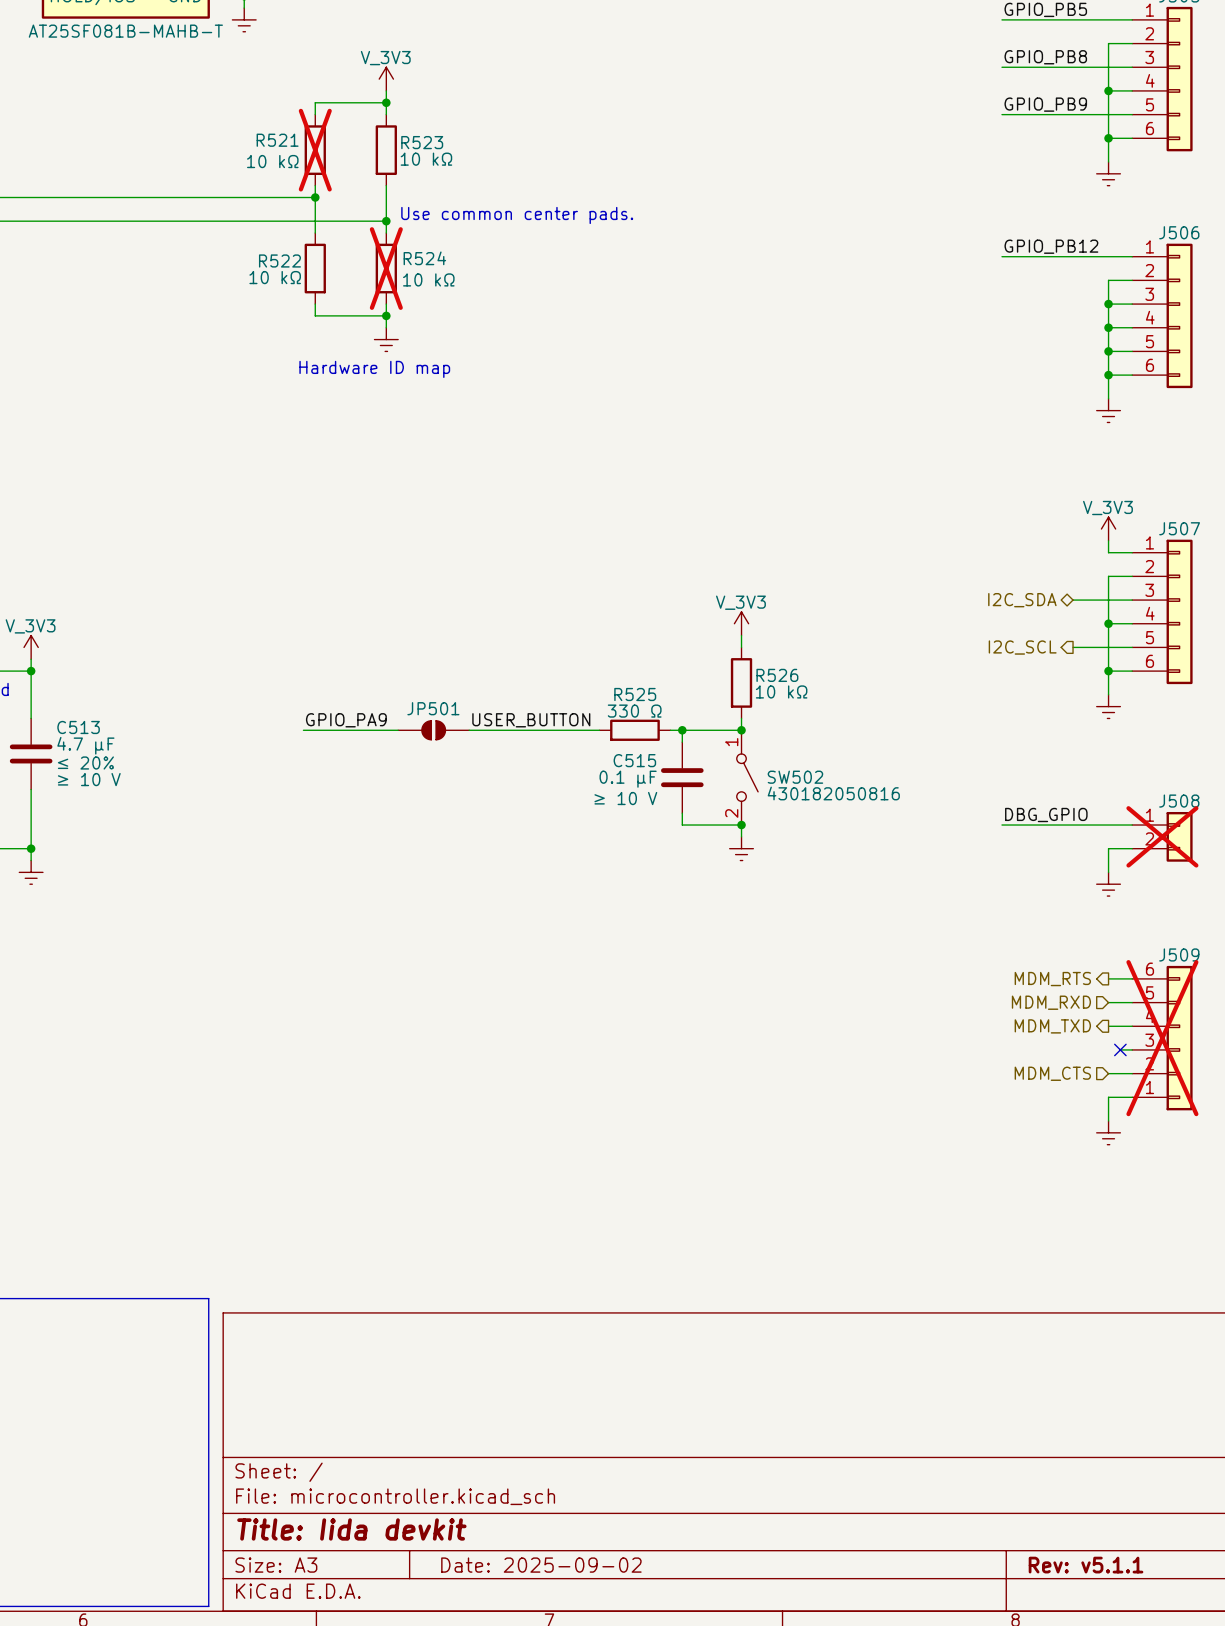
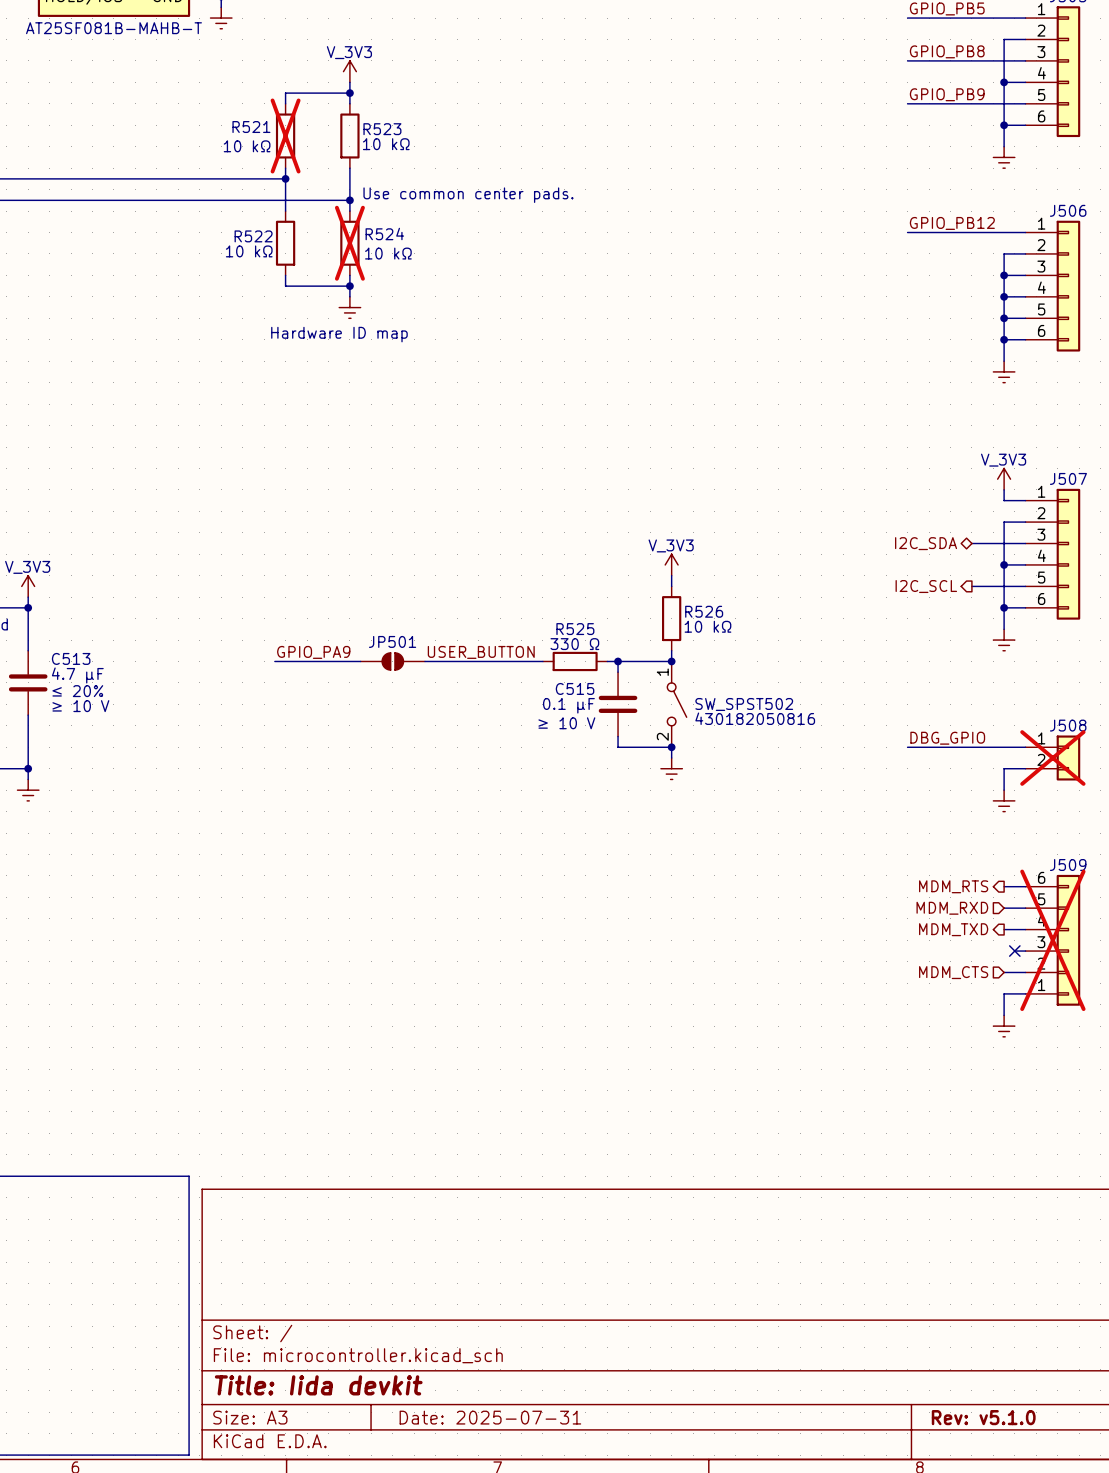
SW502 name: SW502 (795, 777) -> SW_SPST502 (744, 704)
title block: Date: 2025-09-02 (541, 1565) -> Date: 2025-07-31 (490, 1417)
title block: Rev: v5.1.1 (1086, 1565) -> Rev: v5.1.0 (983, 1417)

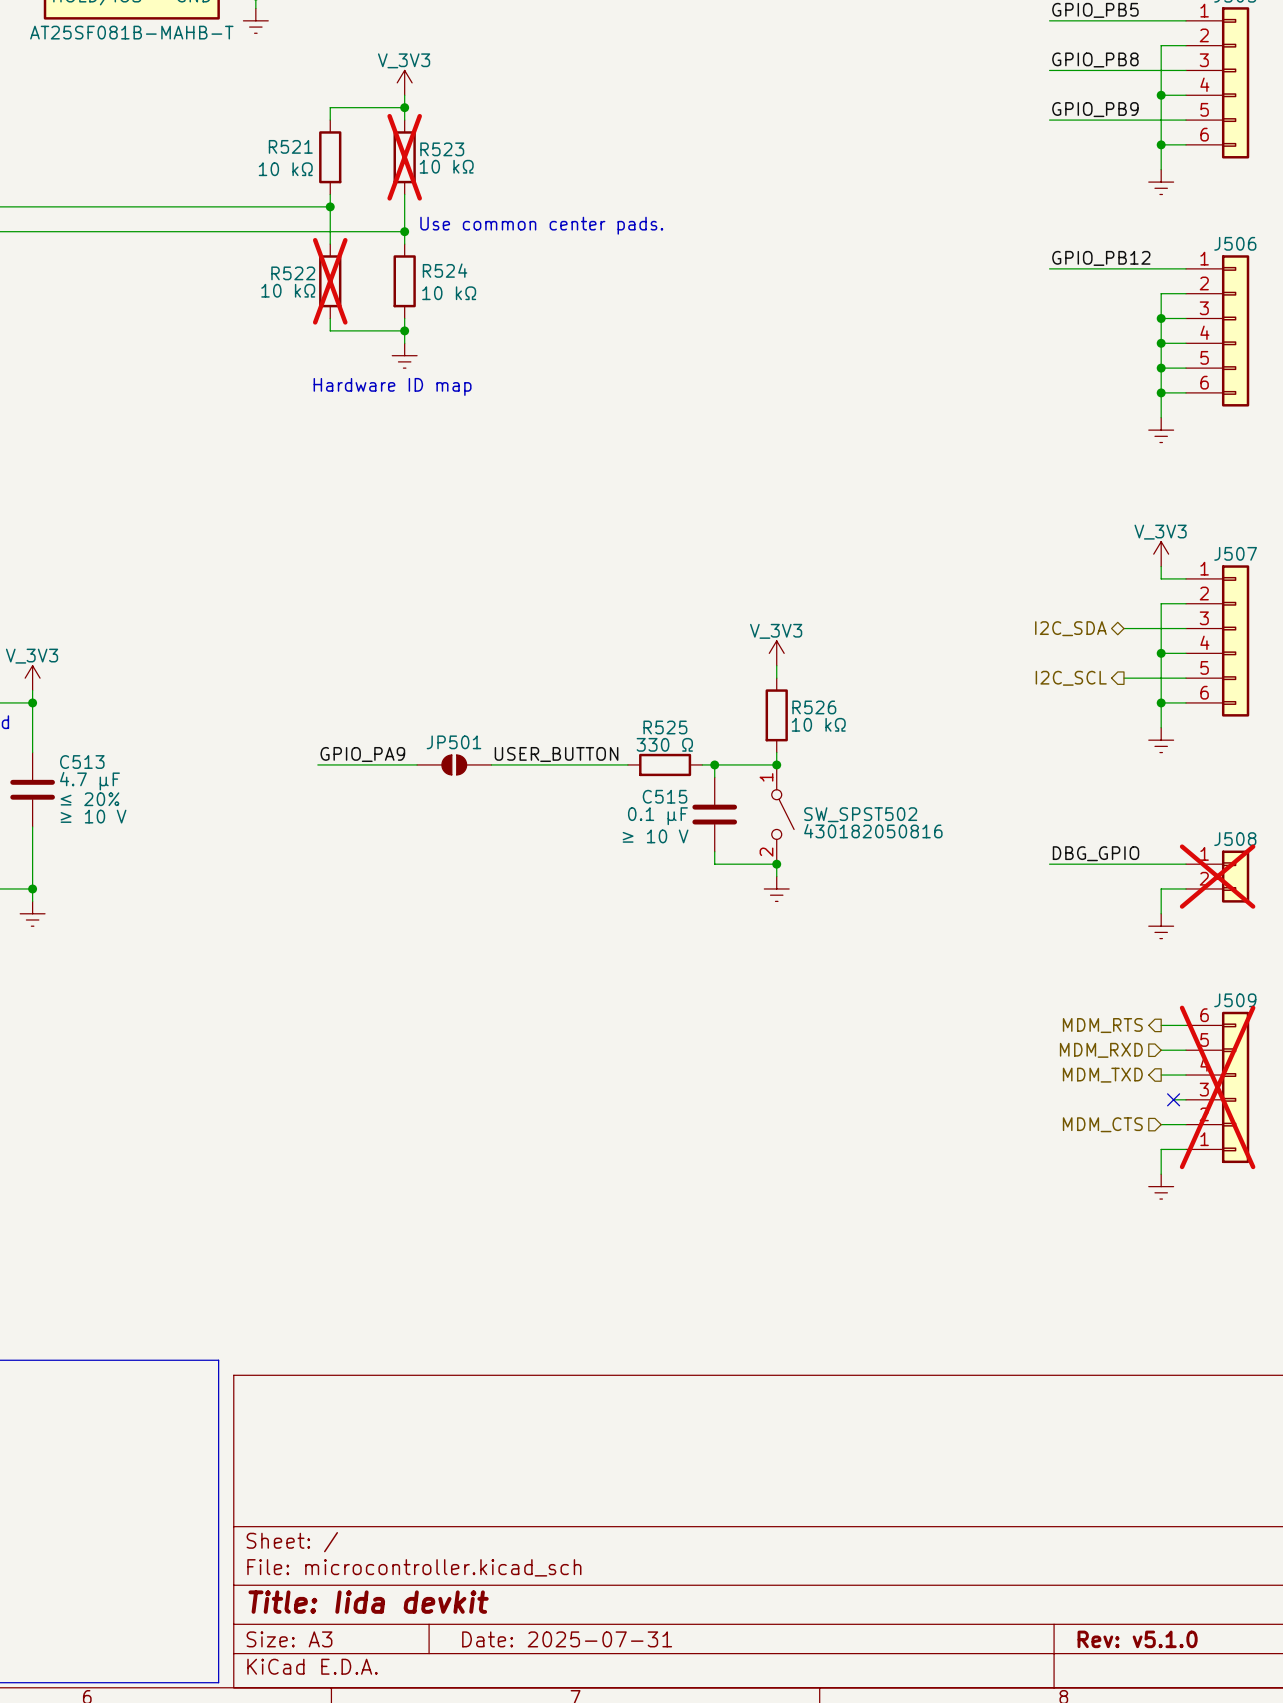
R521 do-not-place cross: (285, 135) -> none
R523 do-not-place cross: none -> (404, 157)
R522 do-not-place cross: none -> (330, 281)
R524 do-not-place cross: (349, 243) -> none

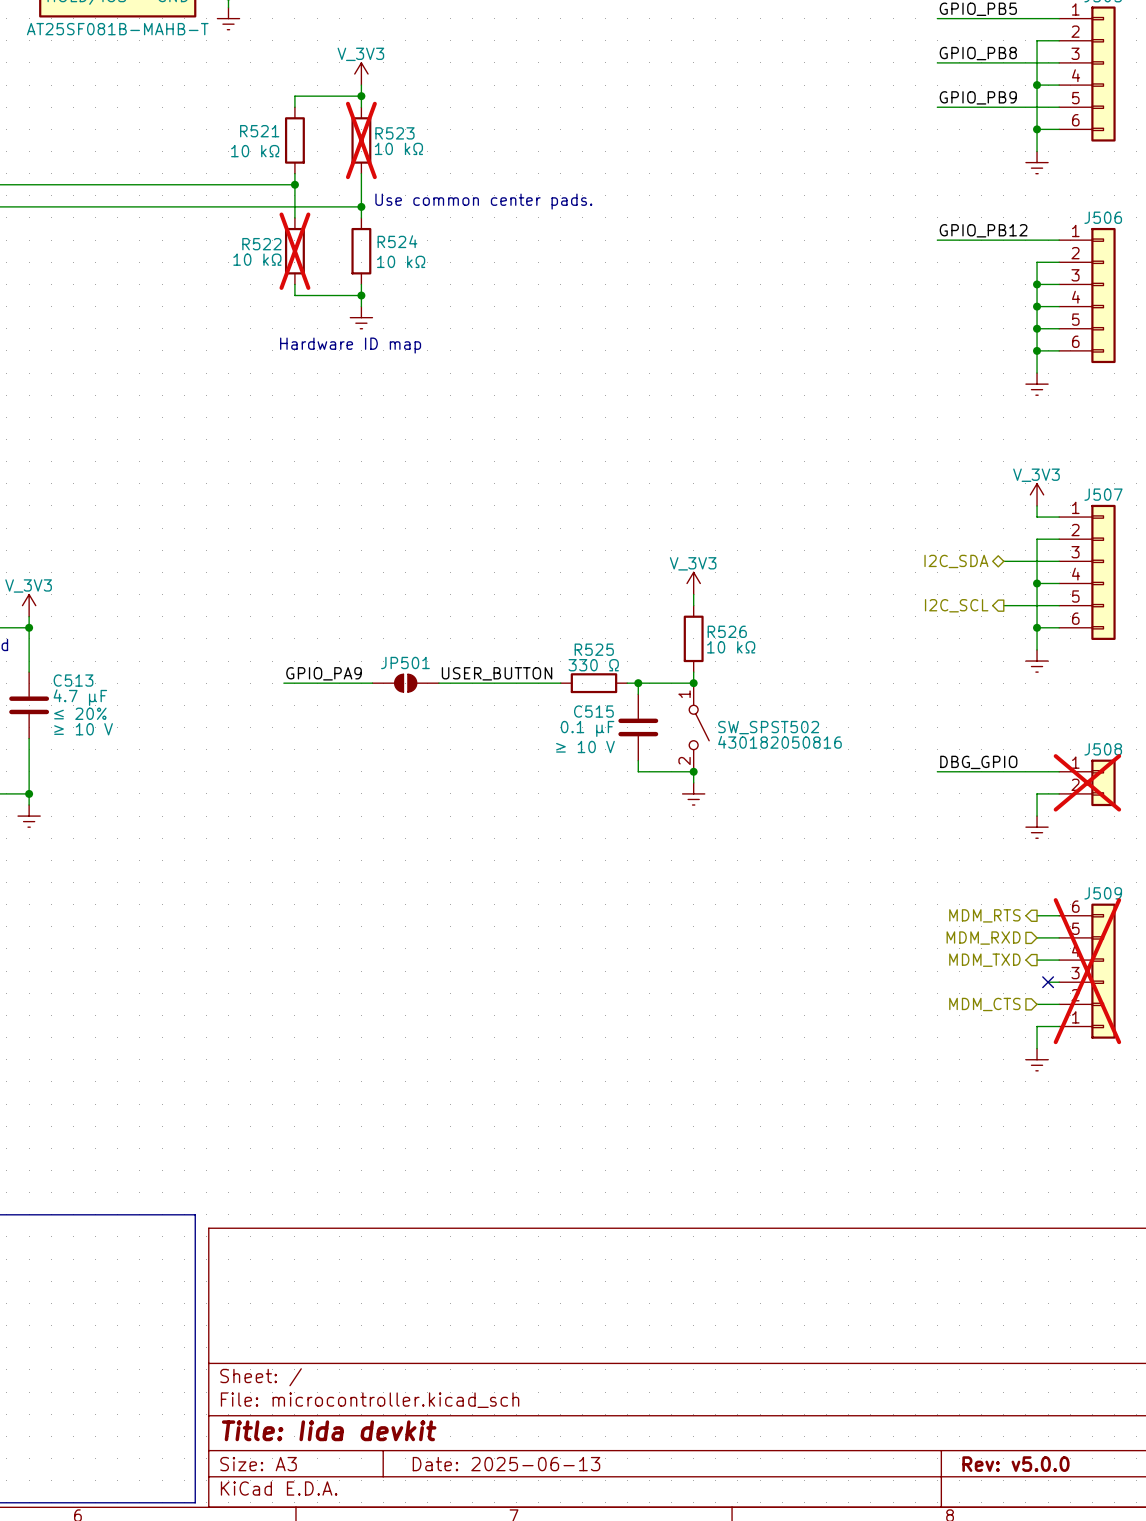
title block: Date: 2025-07-31 (567, 1639) -> Date: 2025-06-13 (506, 1464)
title block: Rev: v5.1.0 (1137, 1639) -> Rev: v5.0.0 (1015, 1464)

